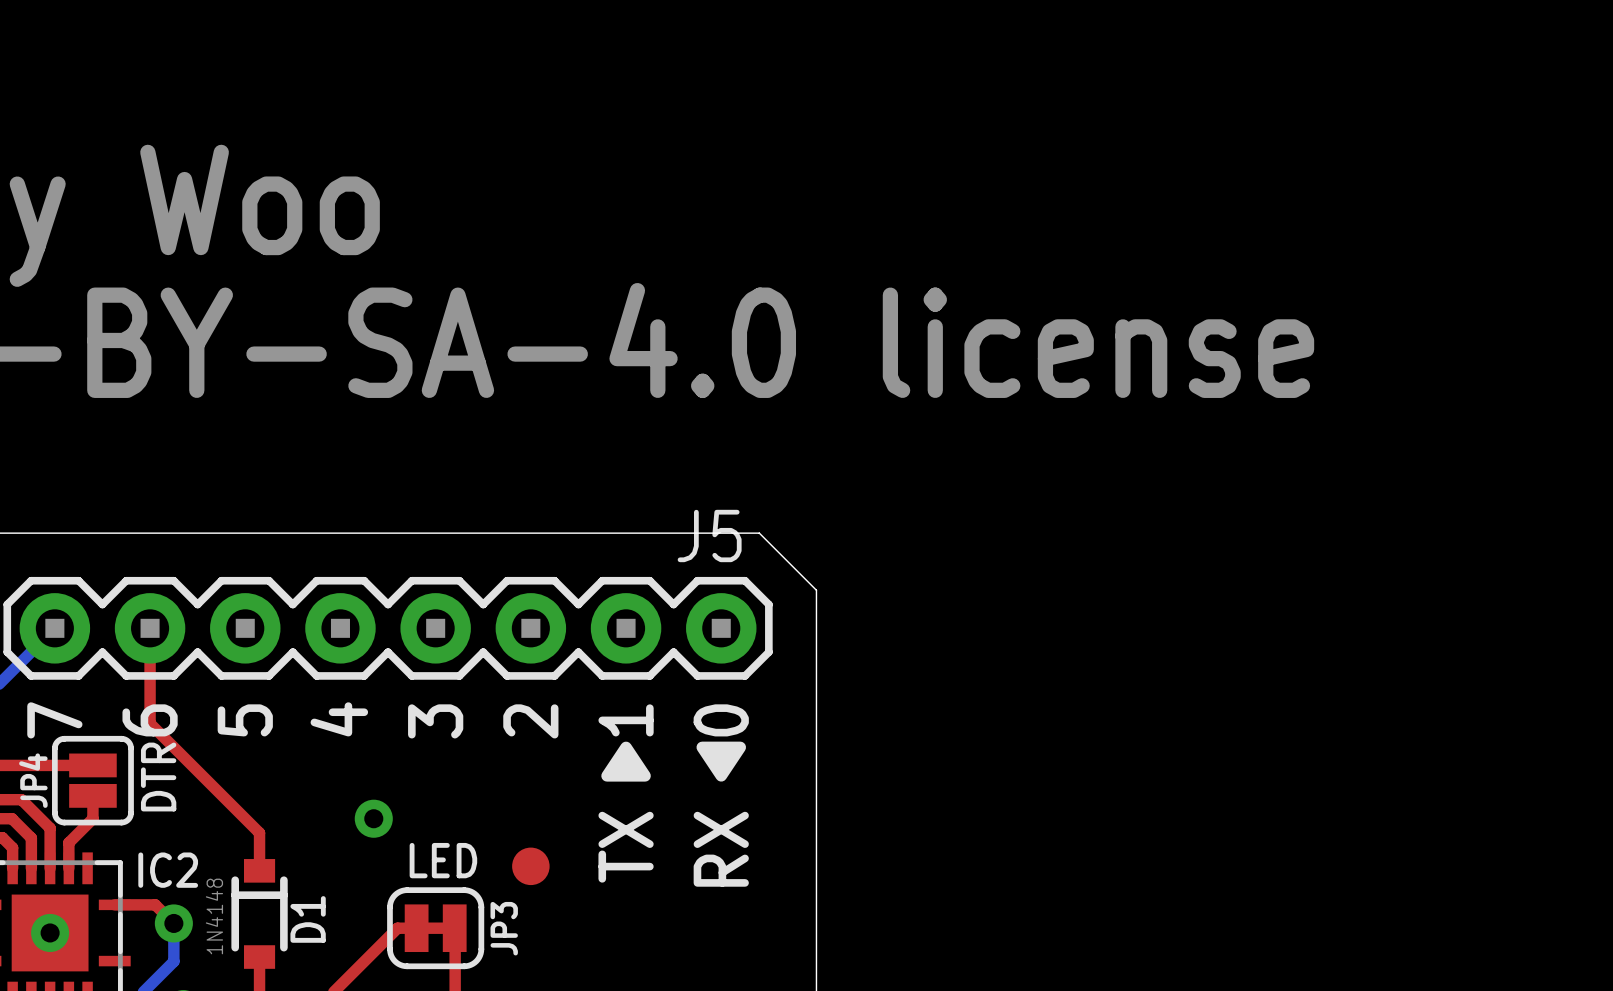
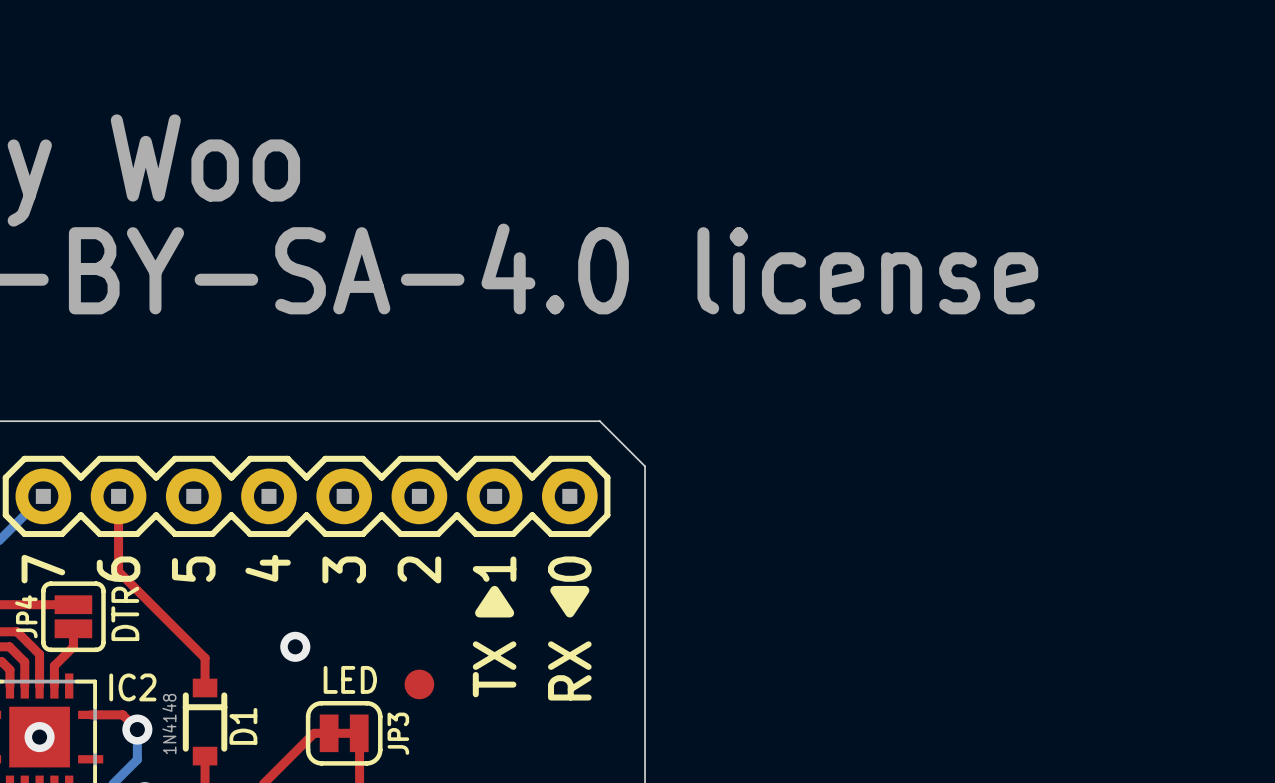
J5 name: J5 (709, 535) -> none

